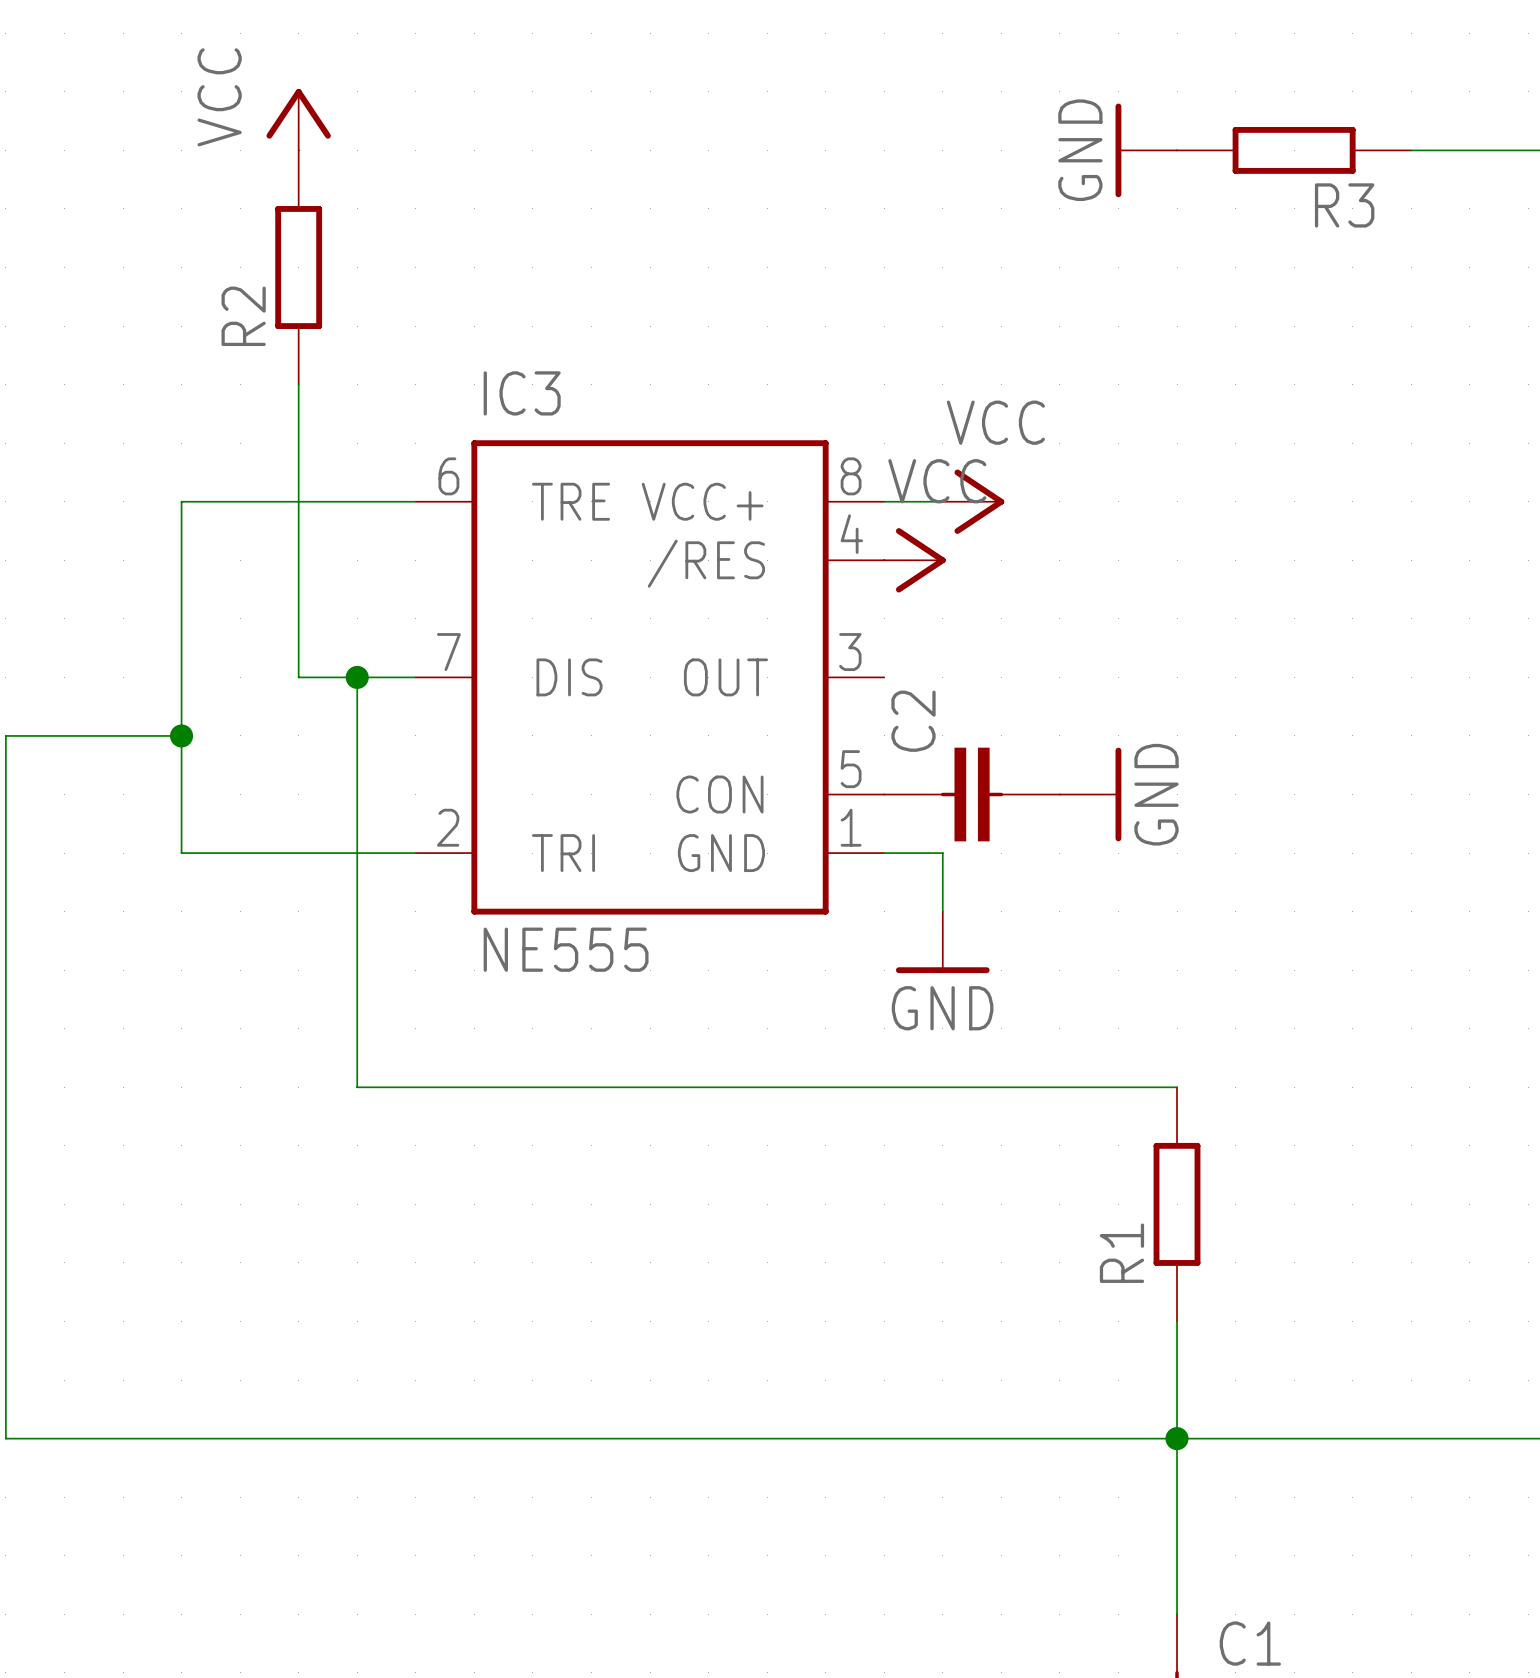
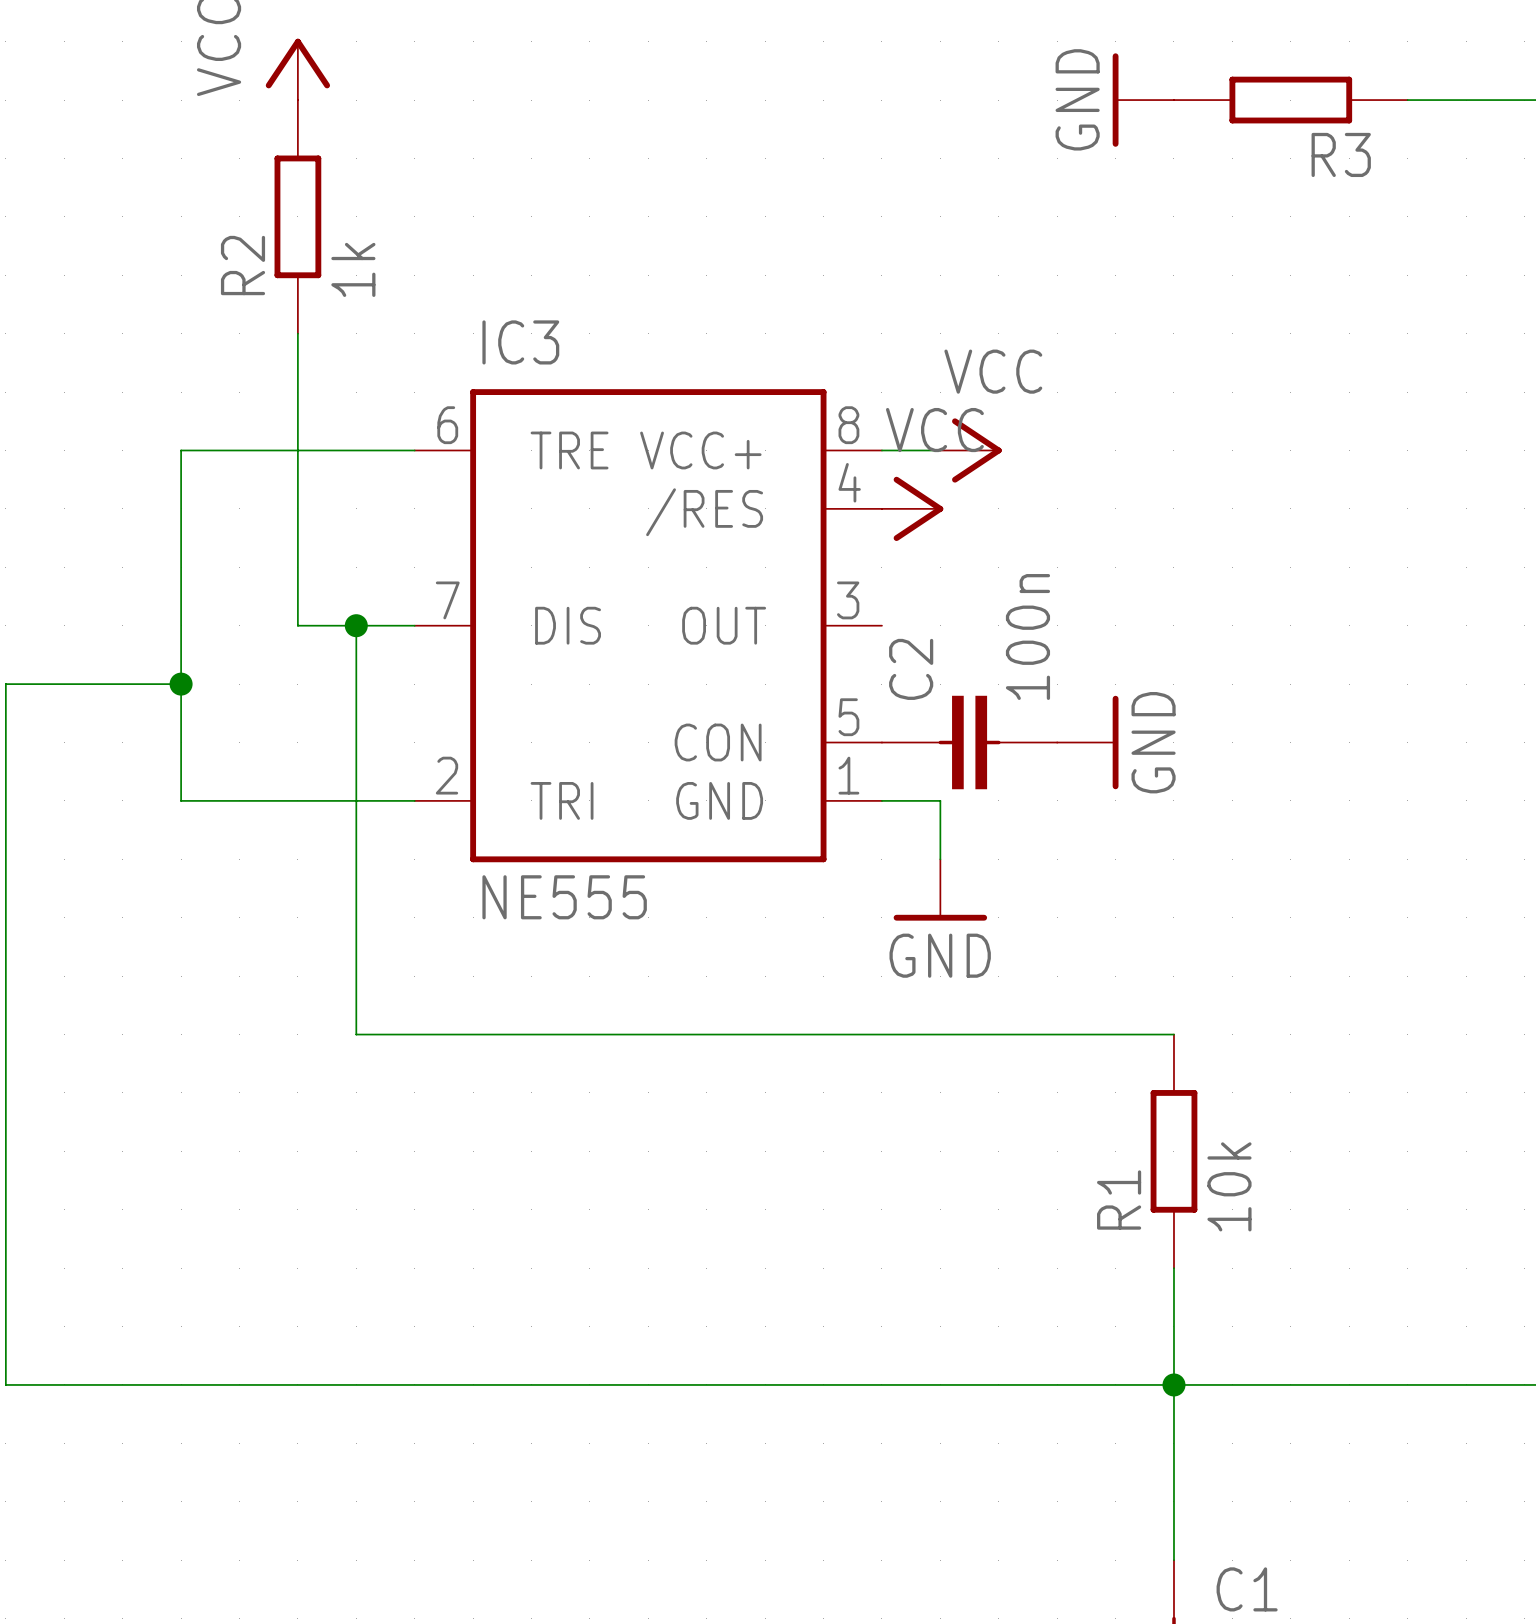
R2 value: none -> 1k (353, 269)
C2 value: none -> 100n (1027, 636)
R1 value: none -> 10k (1229, 1186)

